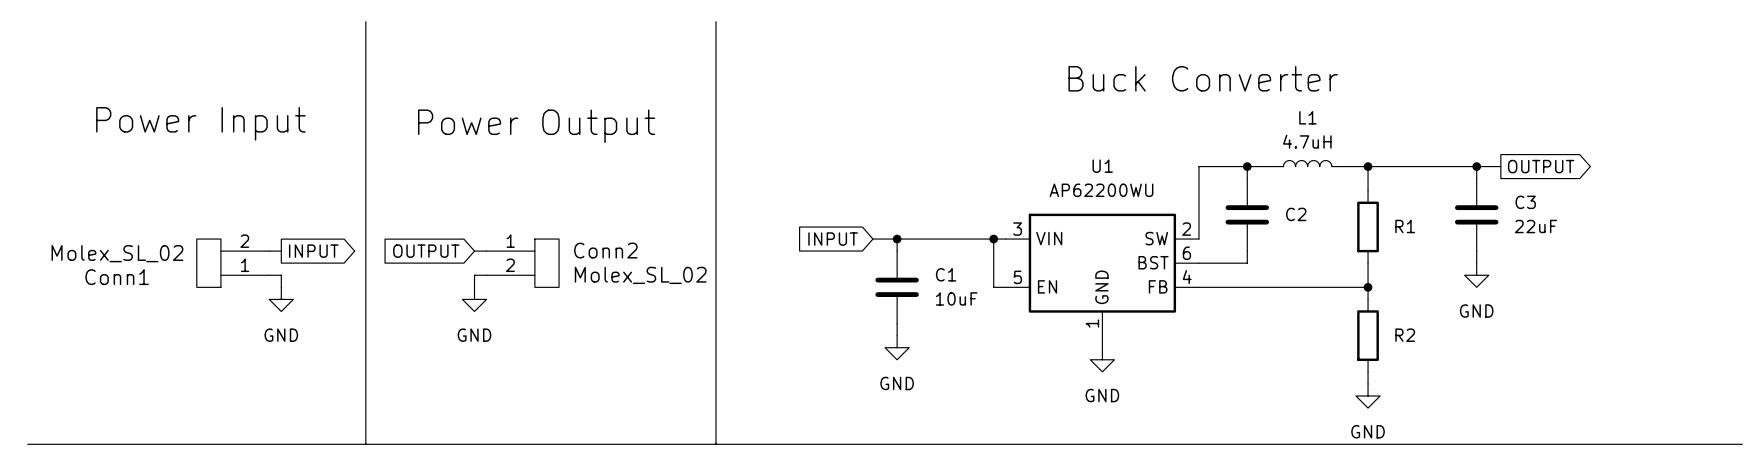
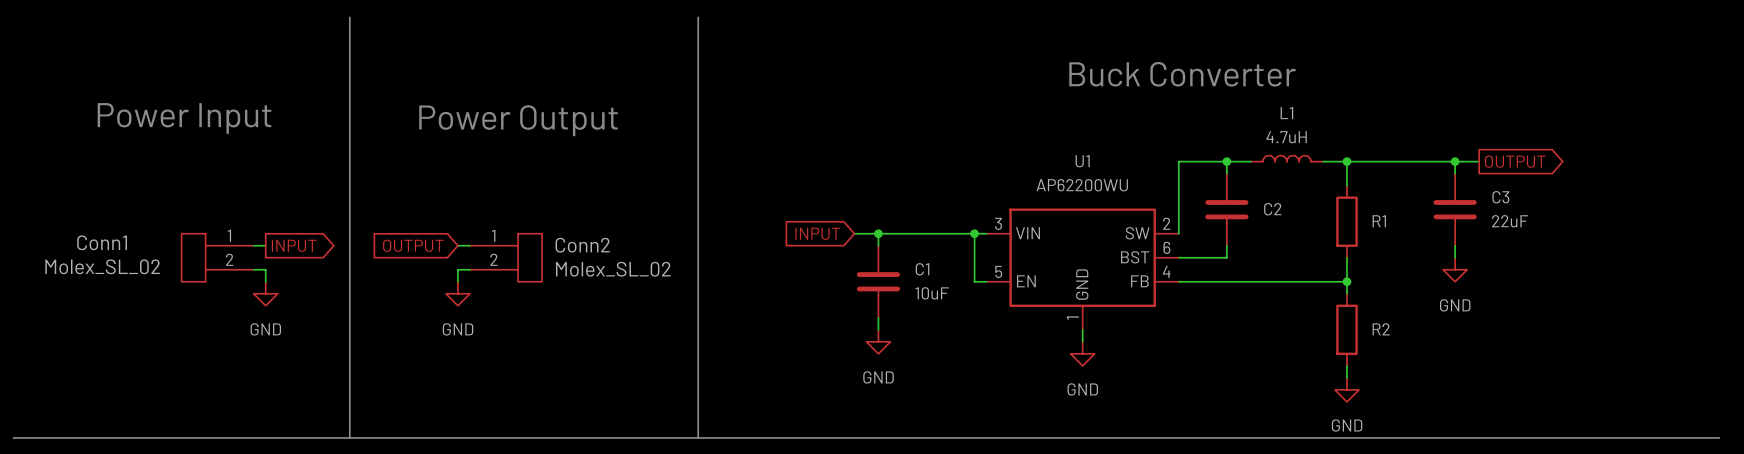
Conn1 flip: as is (208, 263) -> up-down (193, 257)

